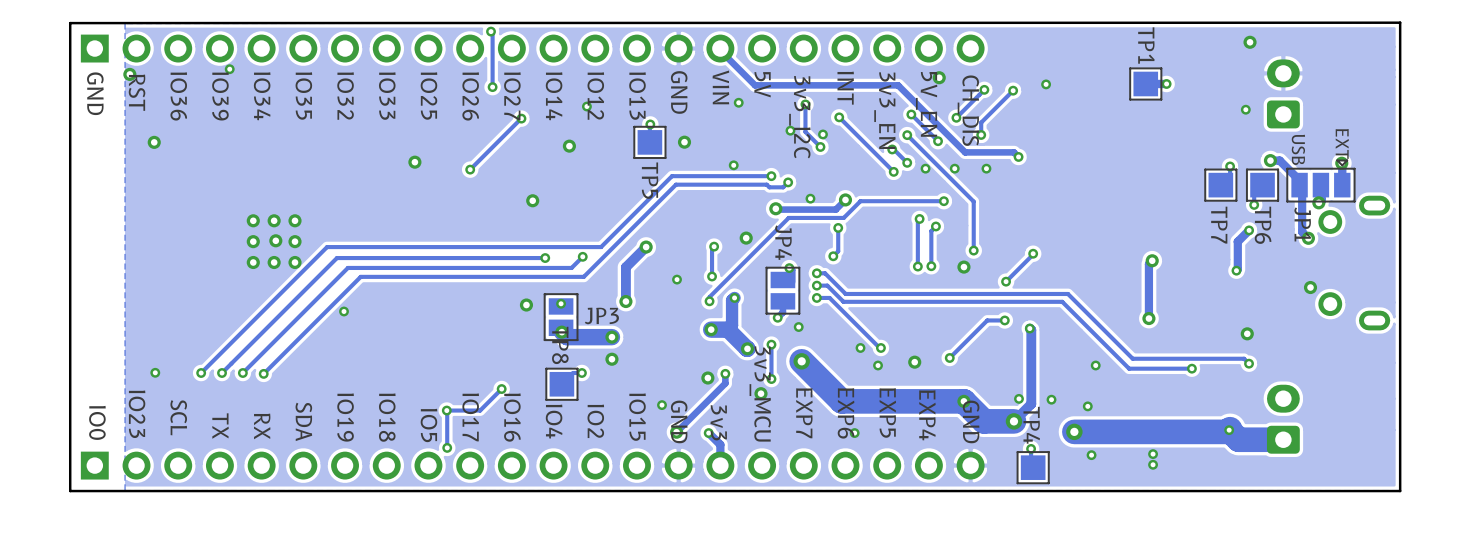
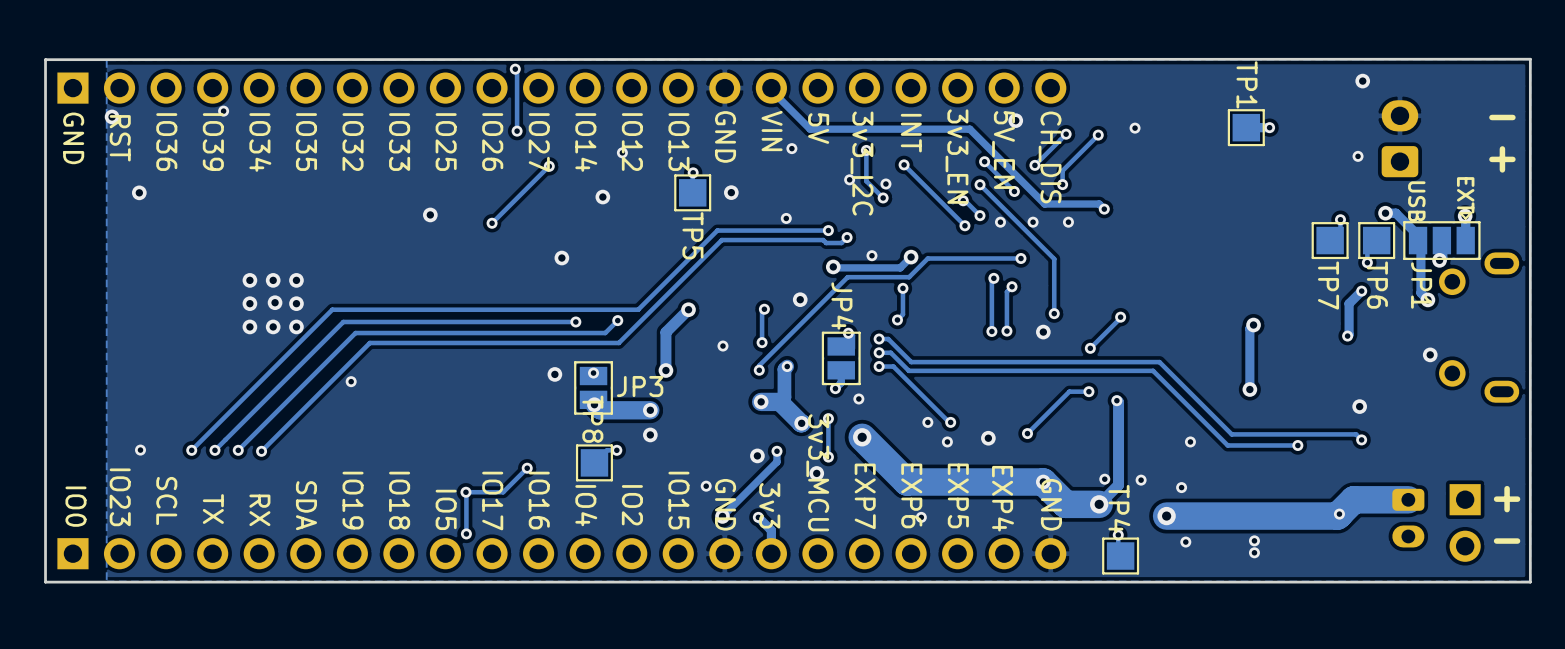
text: none -> - (1502, 117)
text: none -> + (1502, 159)
part footprint: [1266, 384, 1300, 454] -> [1392, 488, 1425, 548]
text: none -> + (1507, 499)
track: none -> (1408, 499) (1353, 499) (1340, 513)
track: (1229, 430) (1238, 439) (1283, 439) -> none
part: none -> (1465, 522)
text: none -> - (1507, 541)

